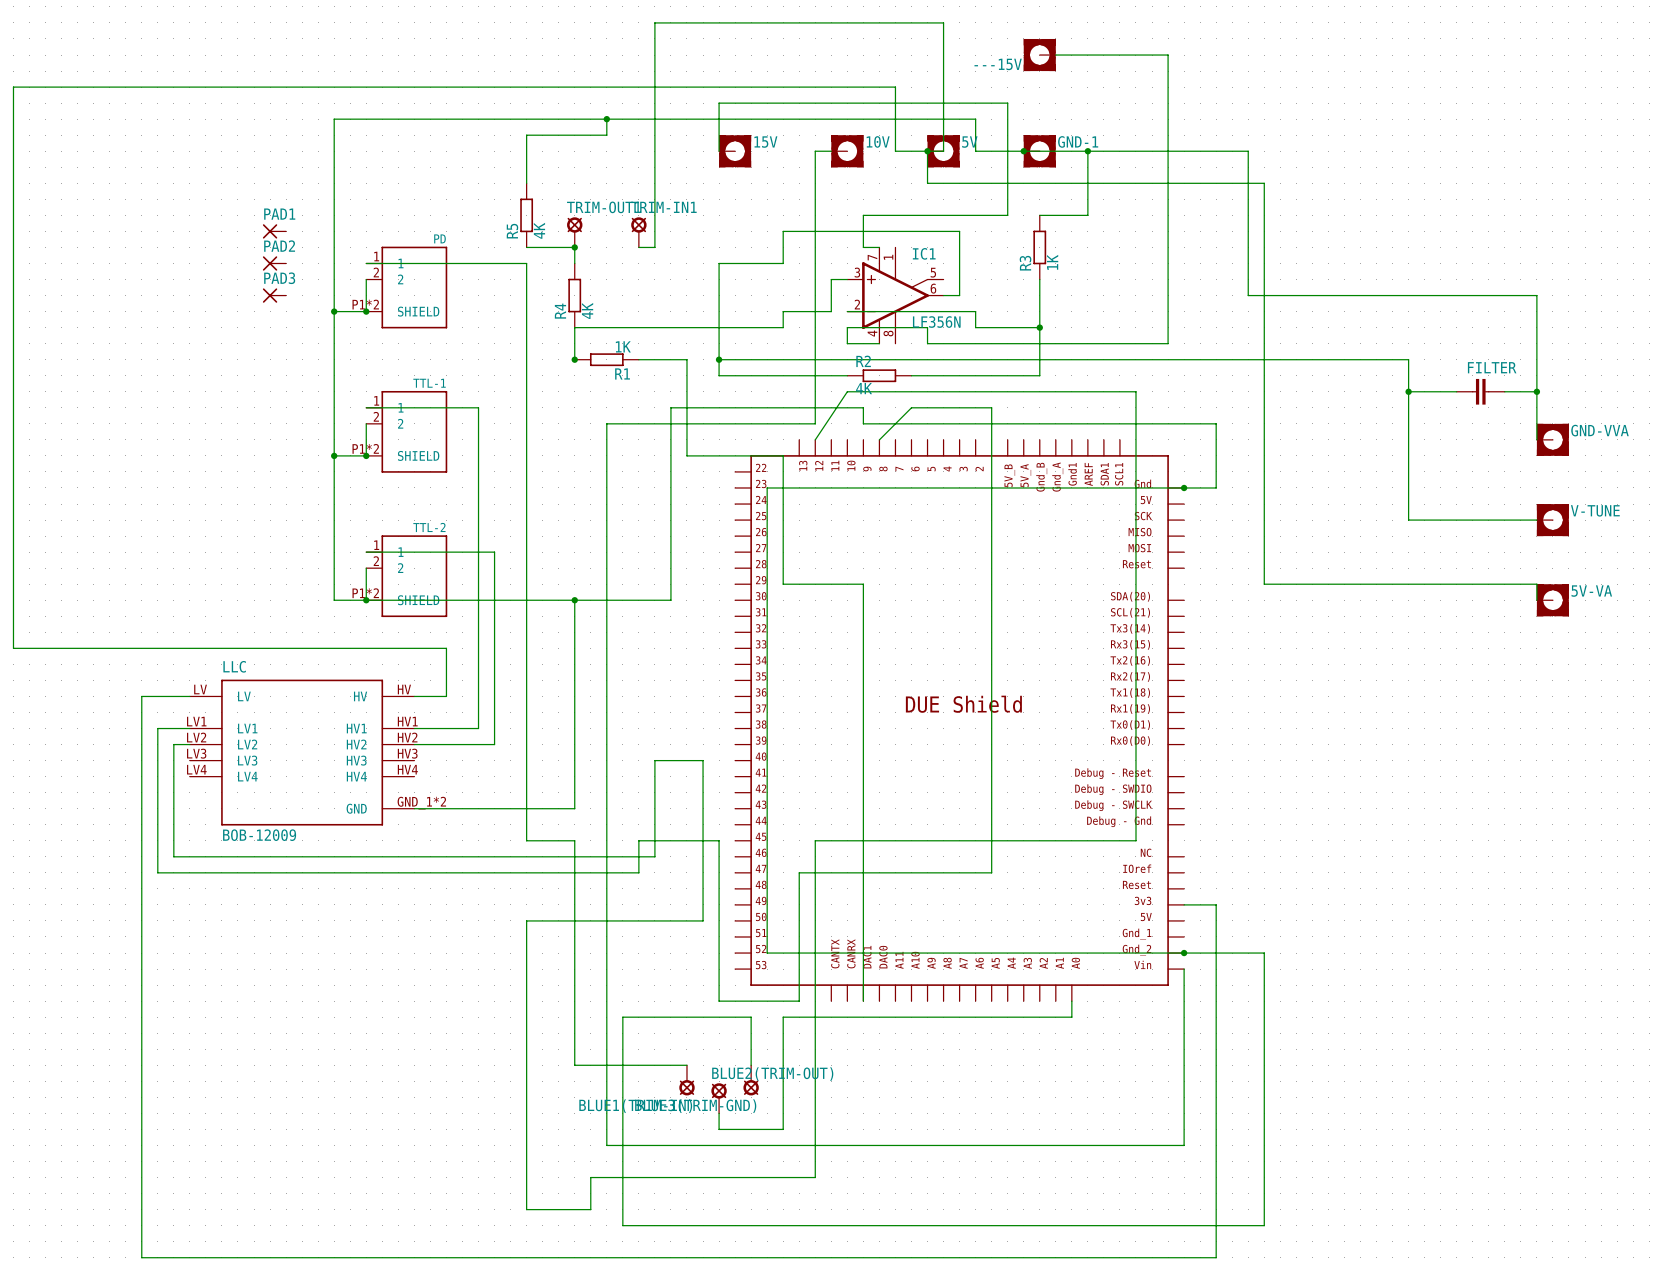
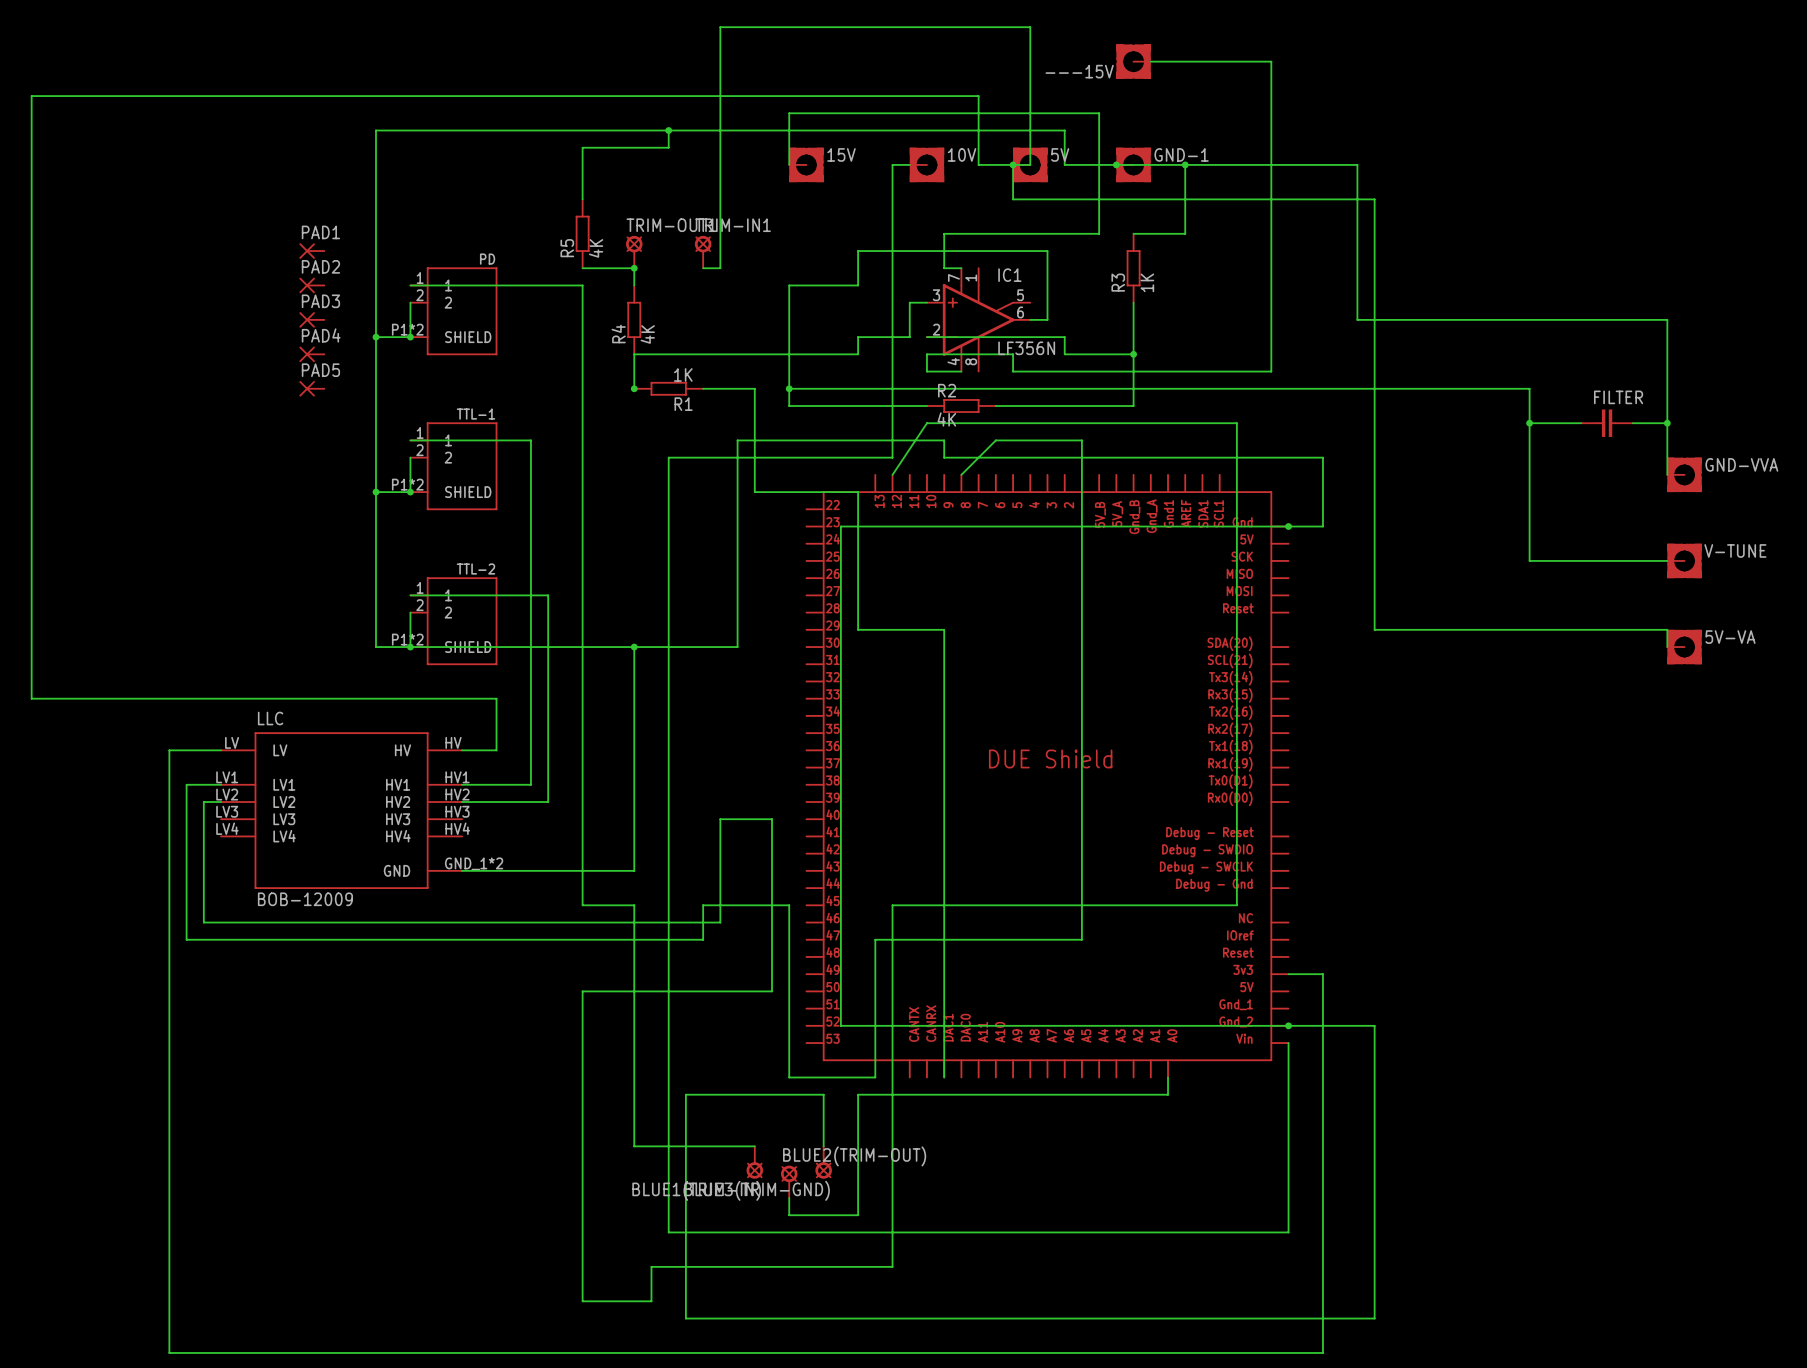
PAD4: none -> (311, 354)
PAD5: none -> (311, 388)

